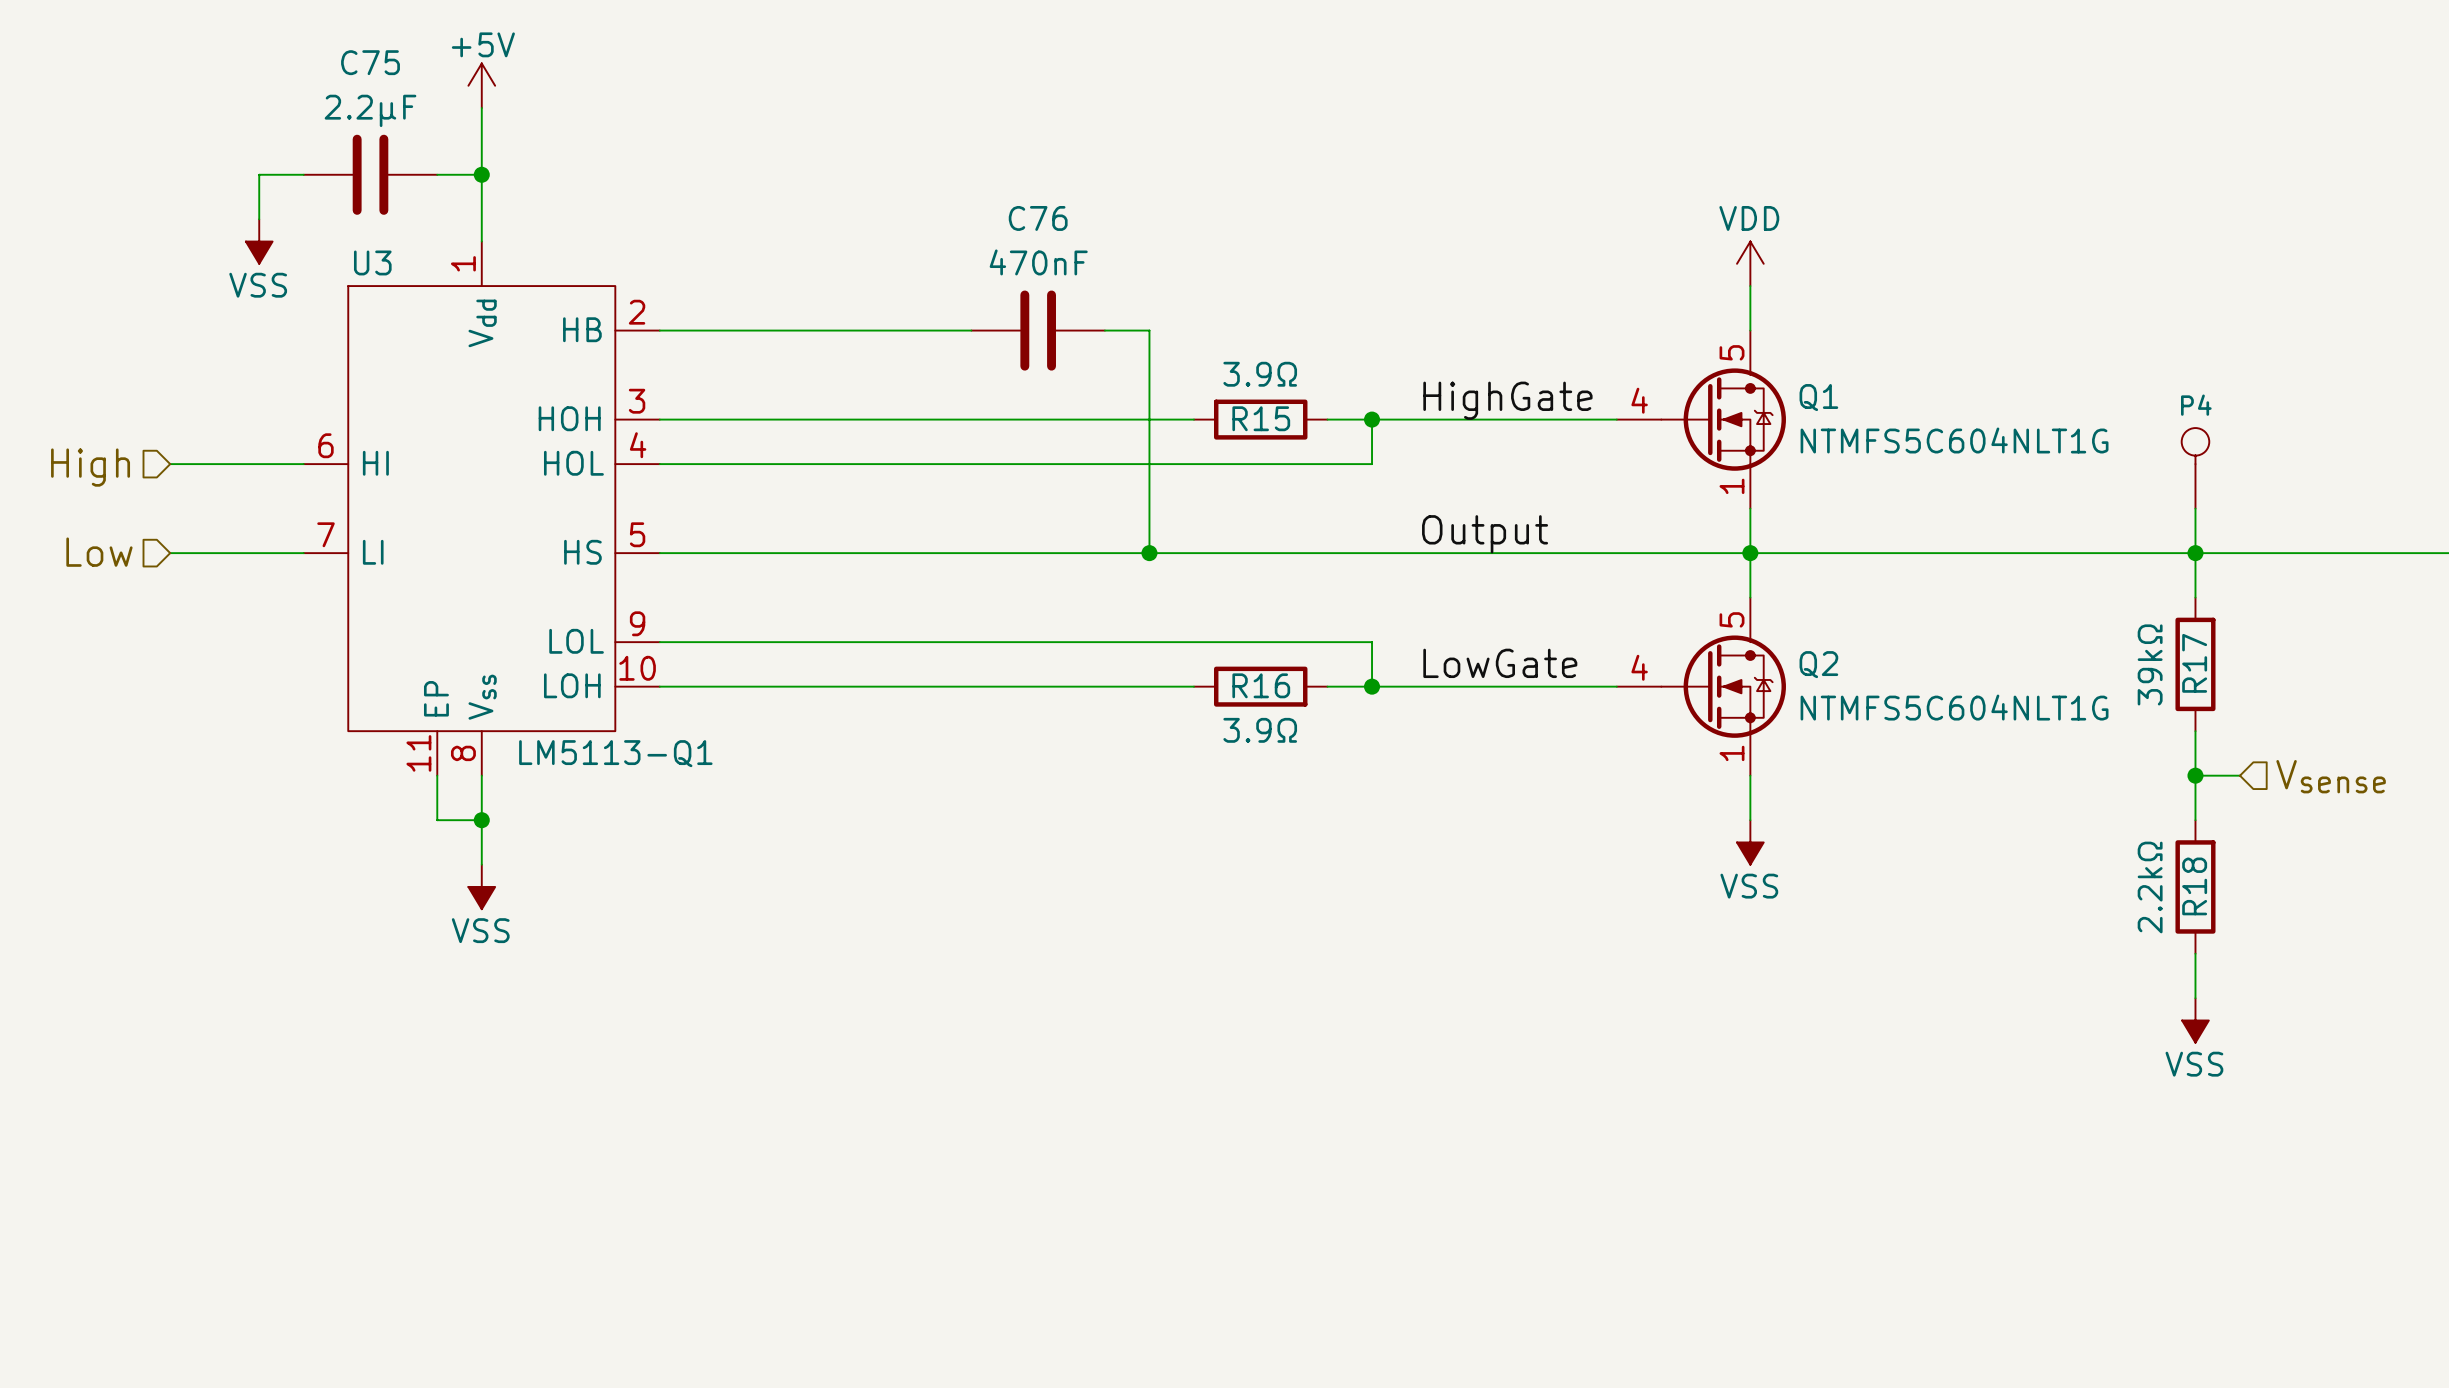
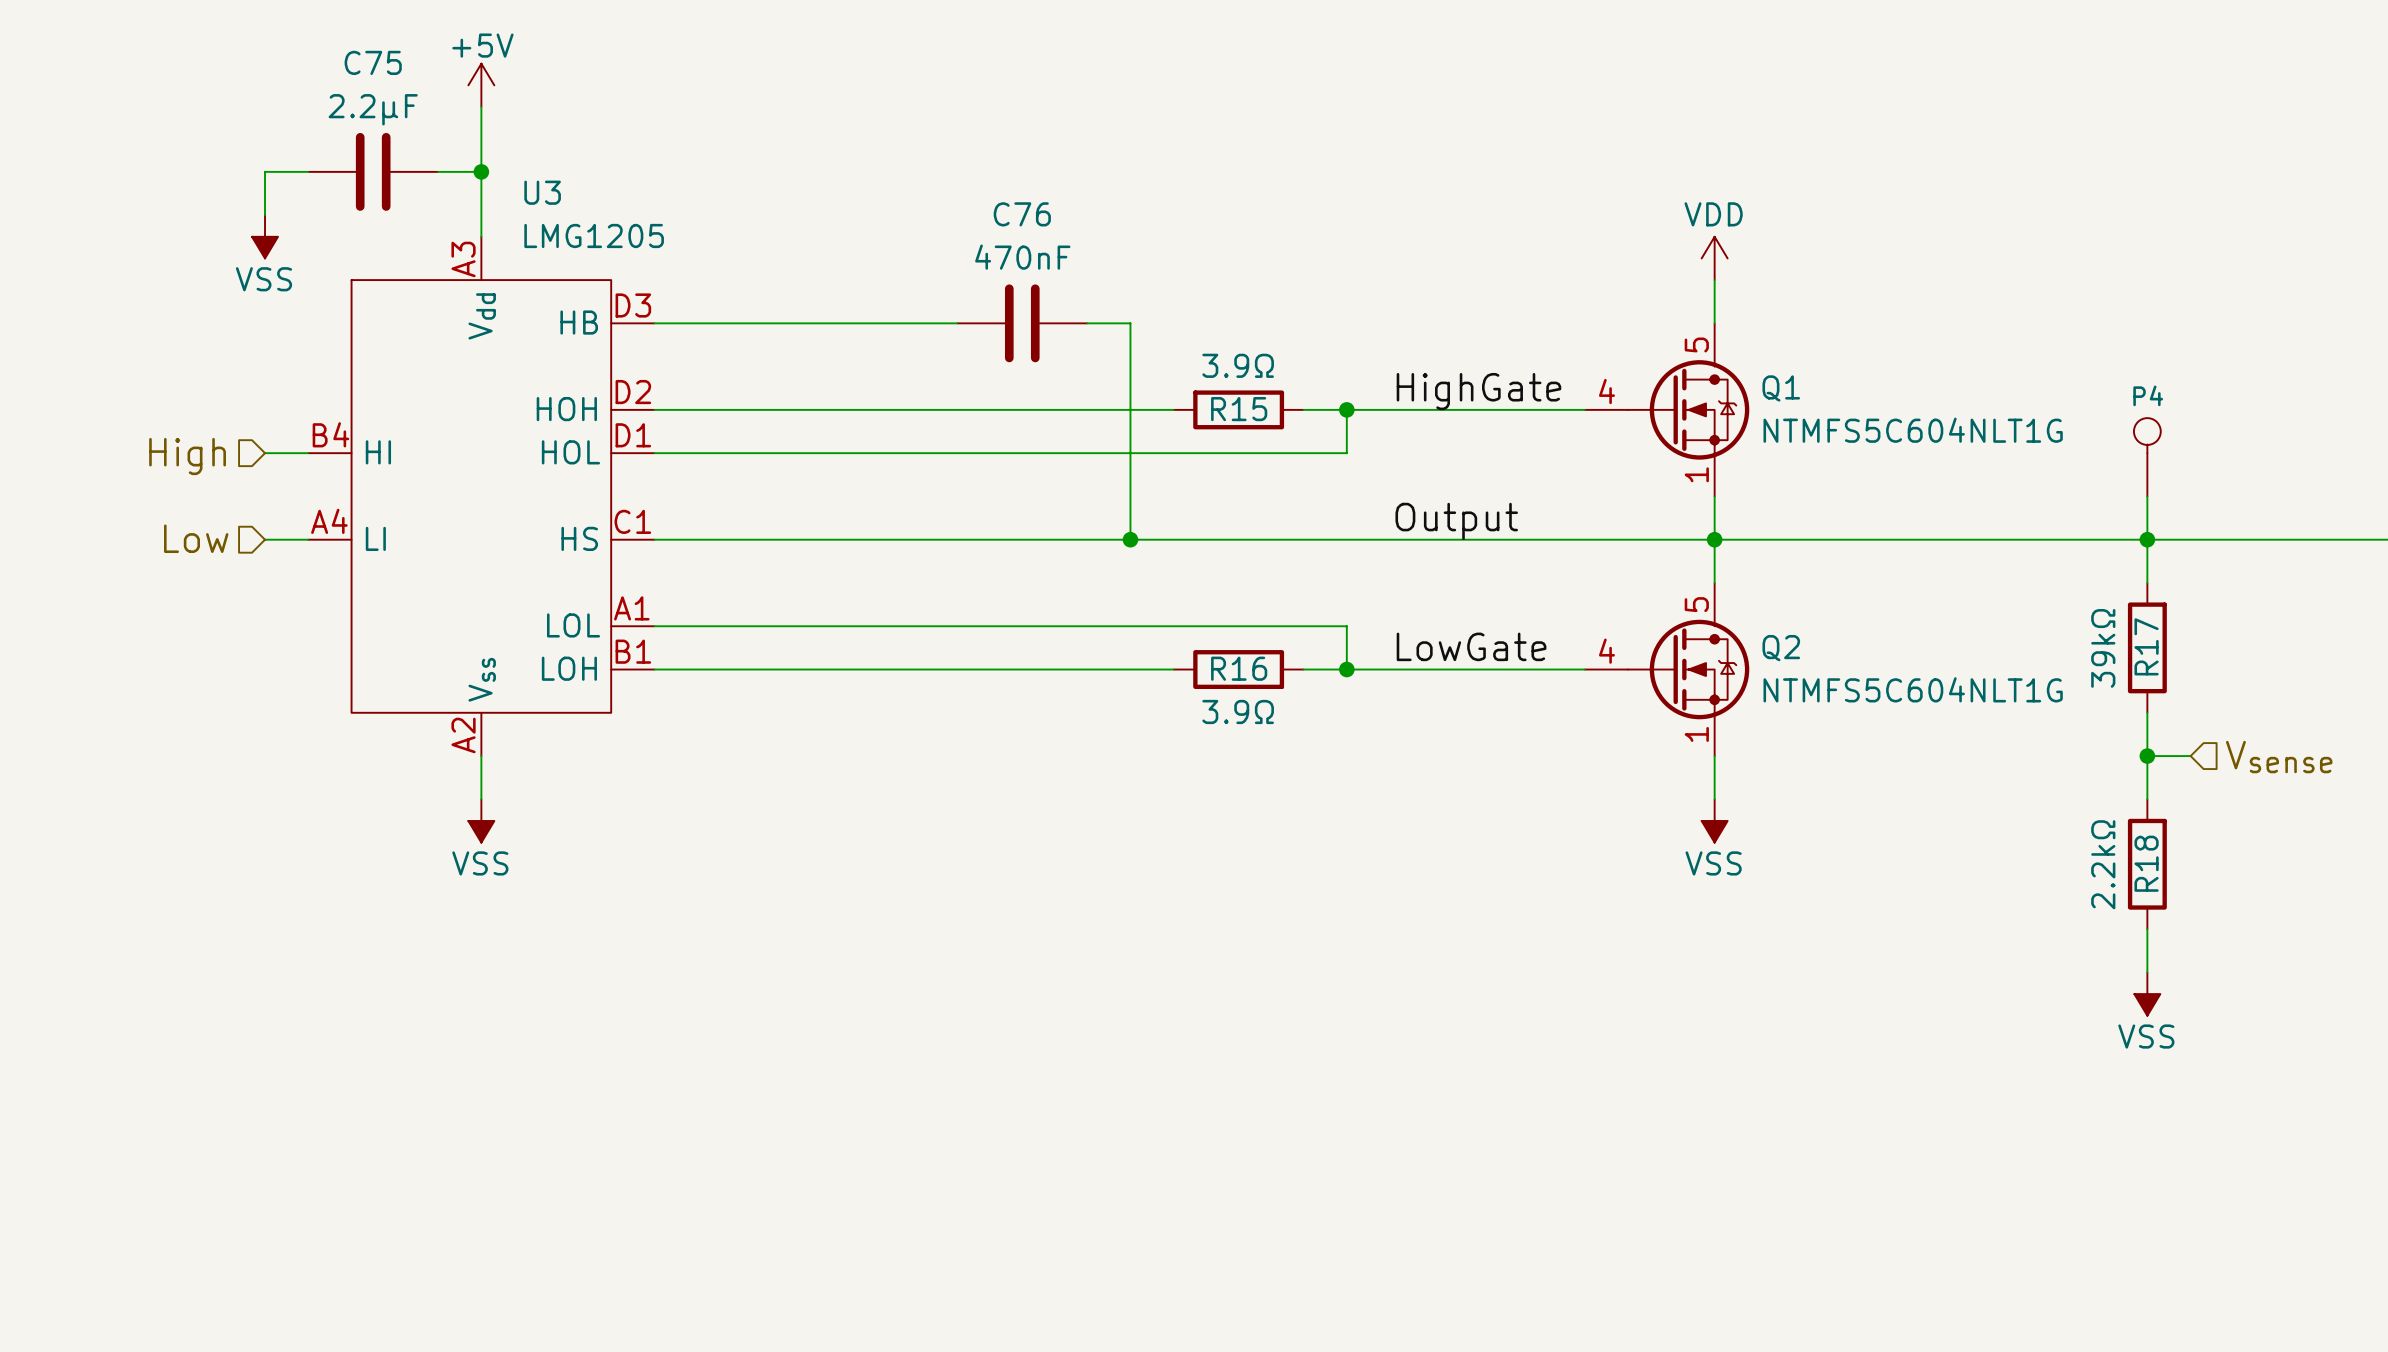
U3 symbol: [303, 241, 660, 776] -> [308, 236, 655, 757]
U3 name position: U3 (372, 262) -> U3 (542, 192)
wire: (170, 464) (259, 464) -> none
hierarchical label position: High (90, 467) -> High (187, 456)
hierarchical label position: Low (99, 552) -> Low (196, 538)
wire: (170, 553) (259, 553) -> none
U3 value: LM5113-Q1 (615, 753) -> LMG1205 (594, 235)
wire: (437, 775) (437, 820) (481, 820) (481, 864) -> none
junction: (481, 820) -> none
power symbol position: VSS (481, 886) -> VSS (481, 820)

